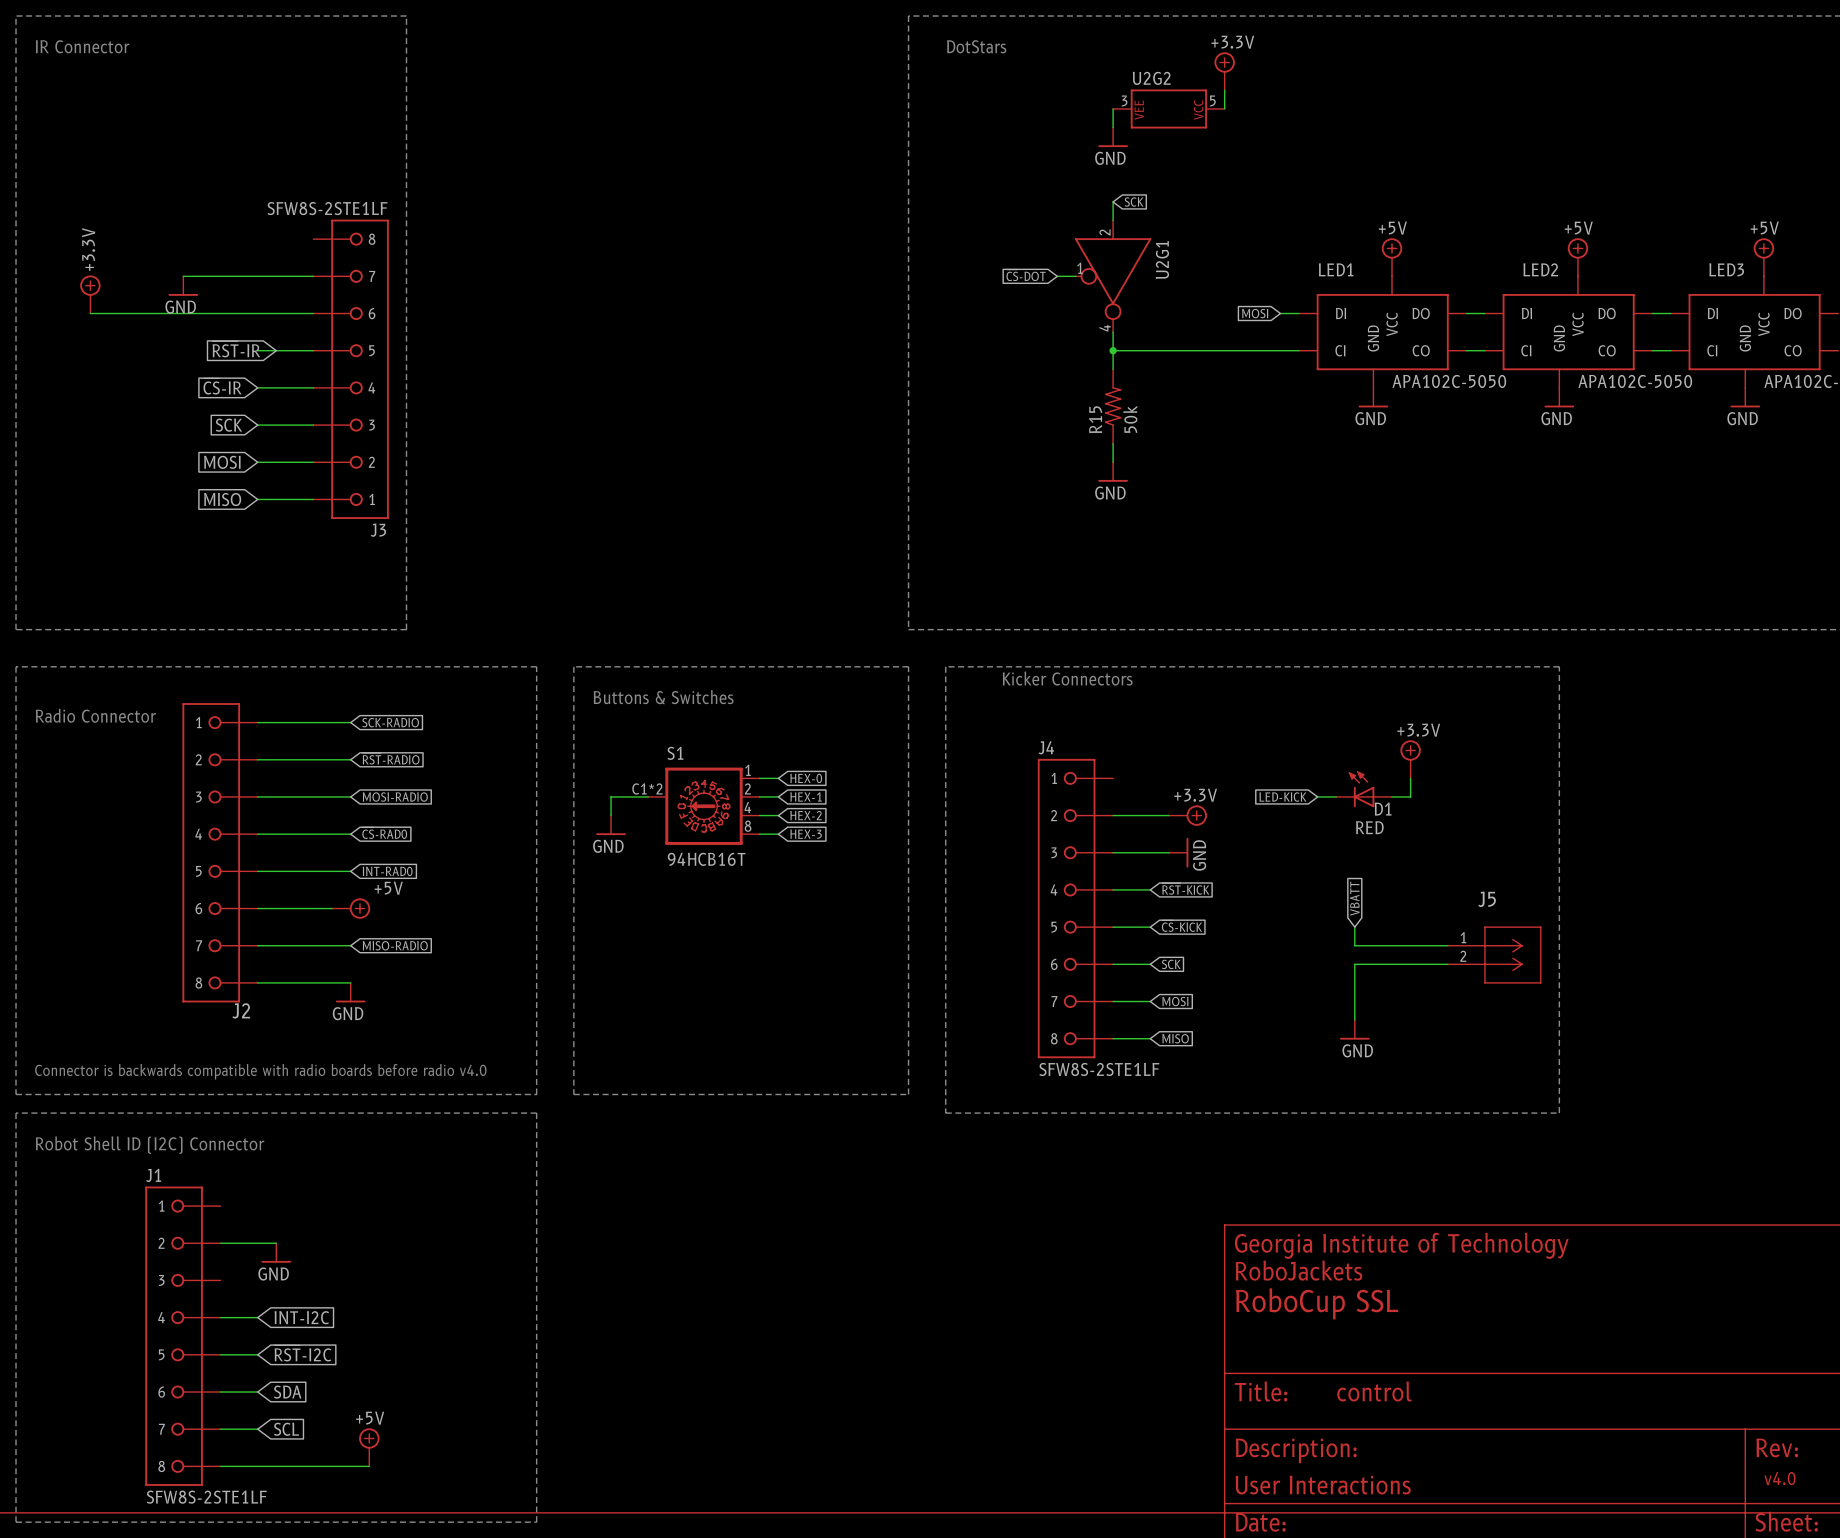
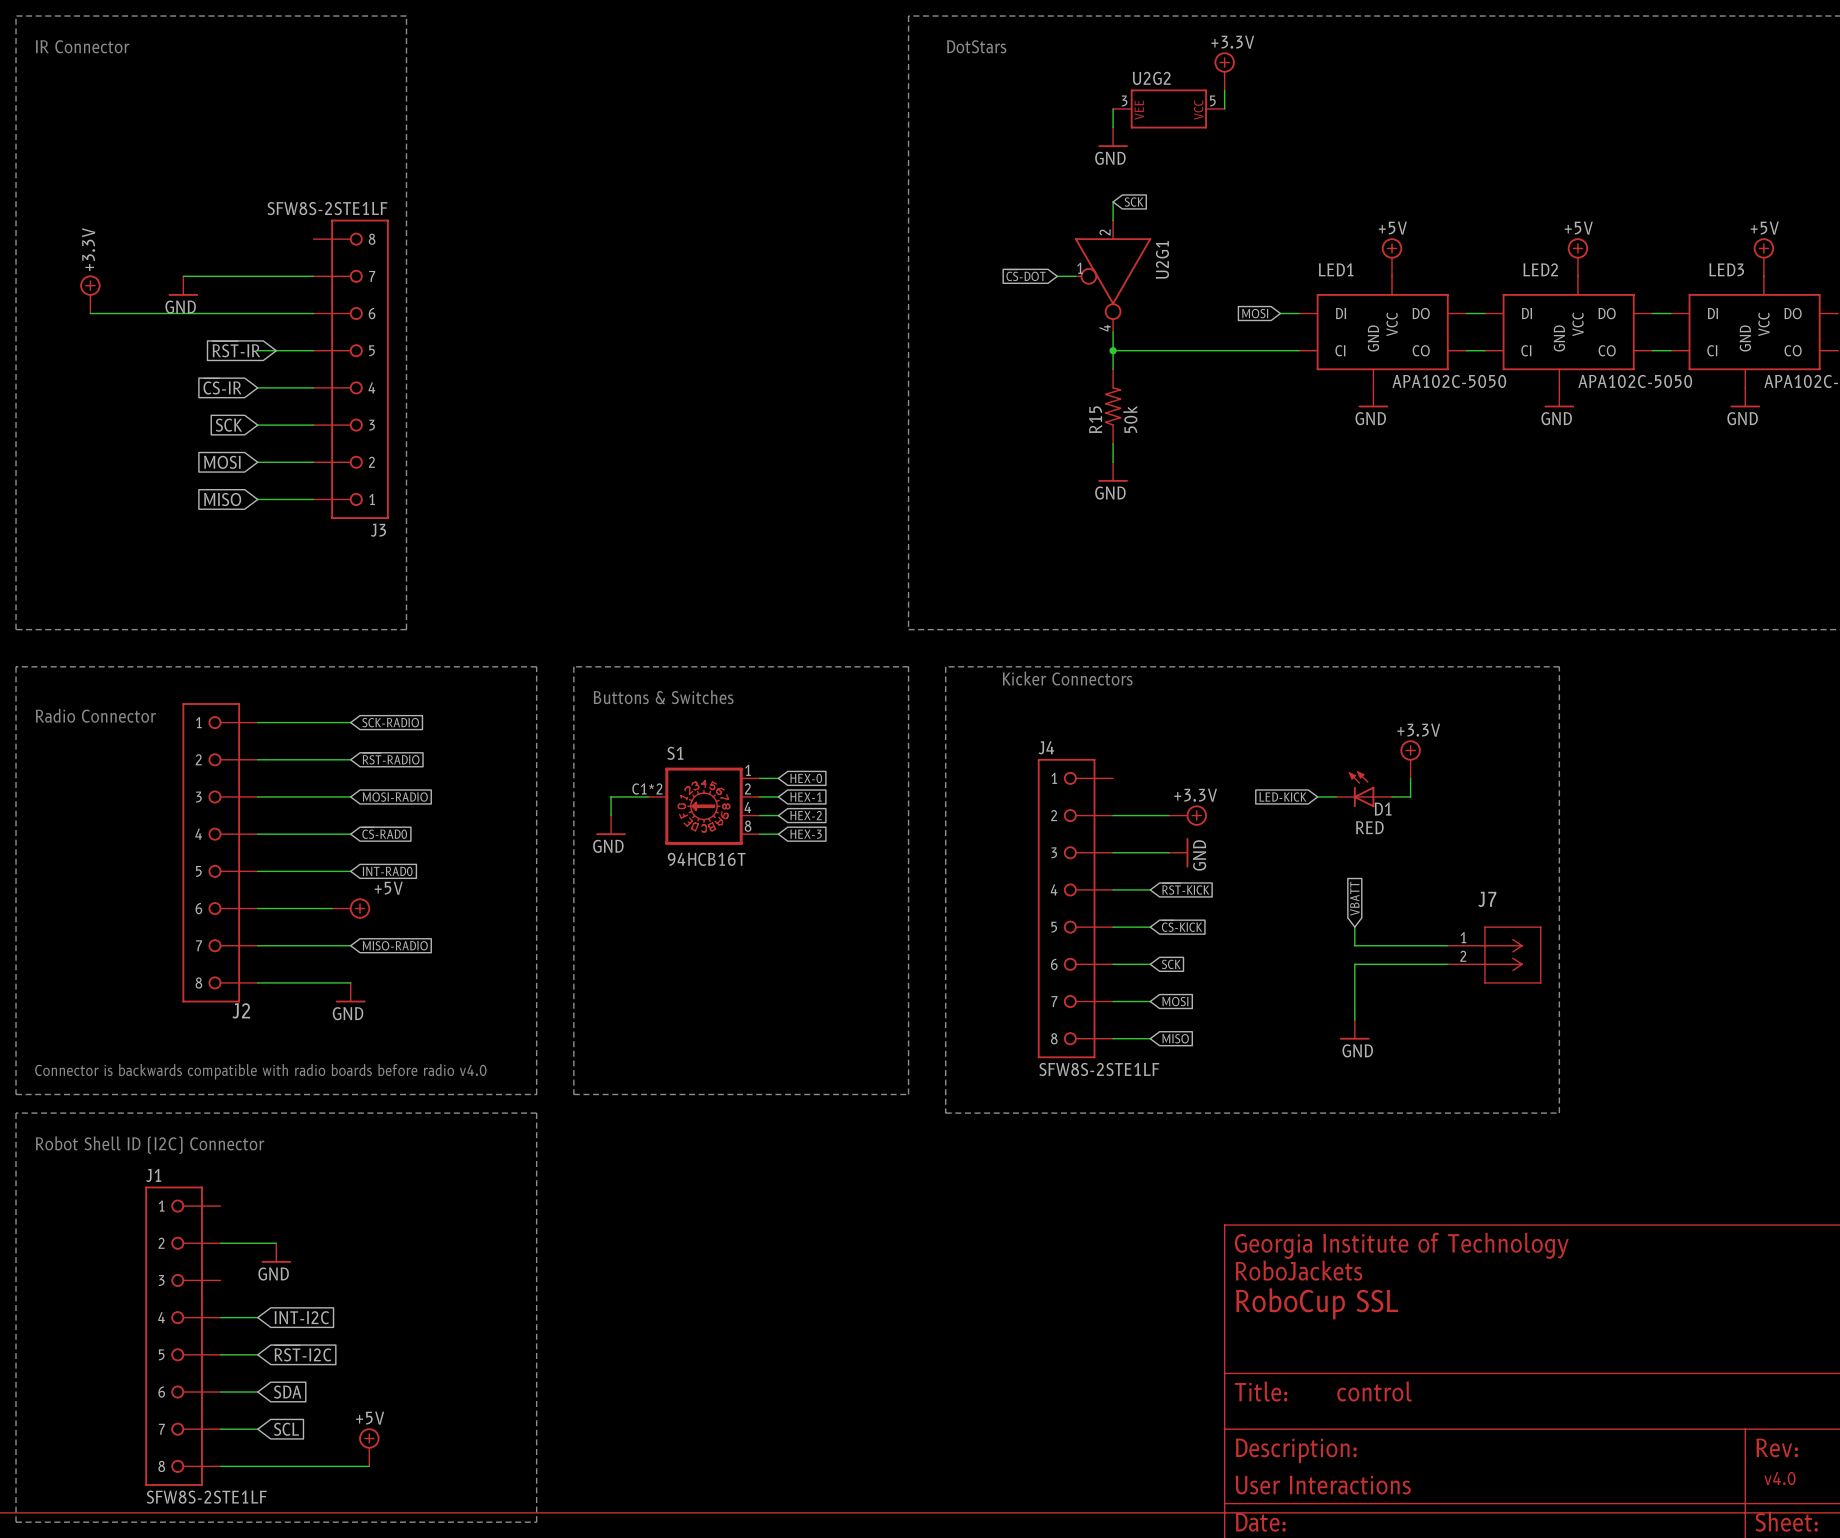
J5: (1494, 955) -> none
J7: none -> (1494, 955)

